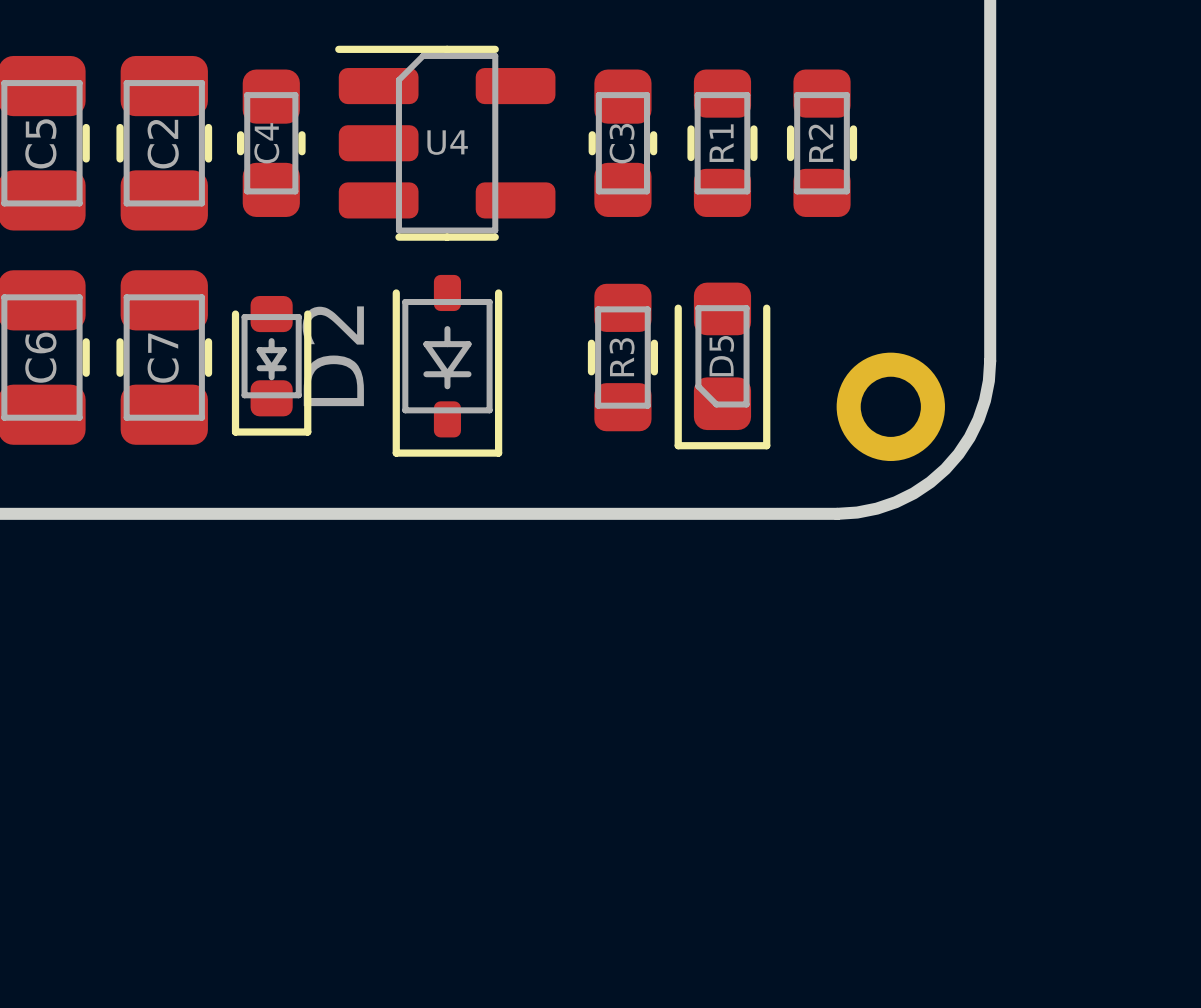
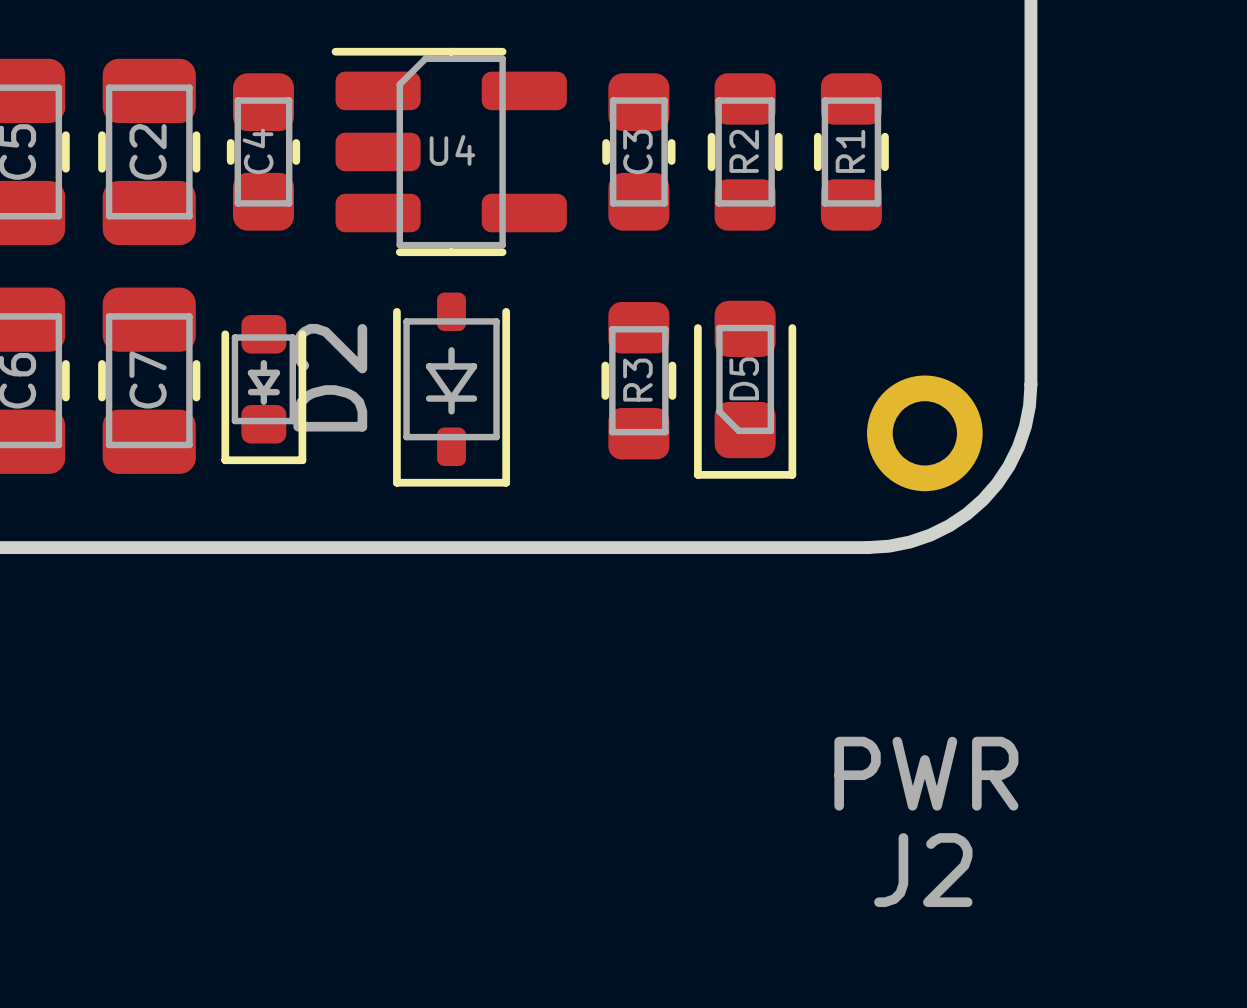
R1 name: R1 (721, 143) -> R2 (744, 151)
R2 name: R2 (820, 143) -> R1 (850, 151)
J2 value: none -> PWR (926, 773)
J2 name: none -> J2 (923, 870)

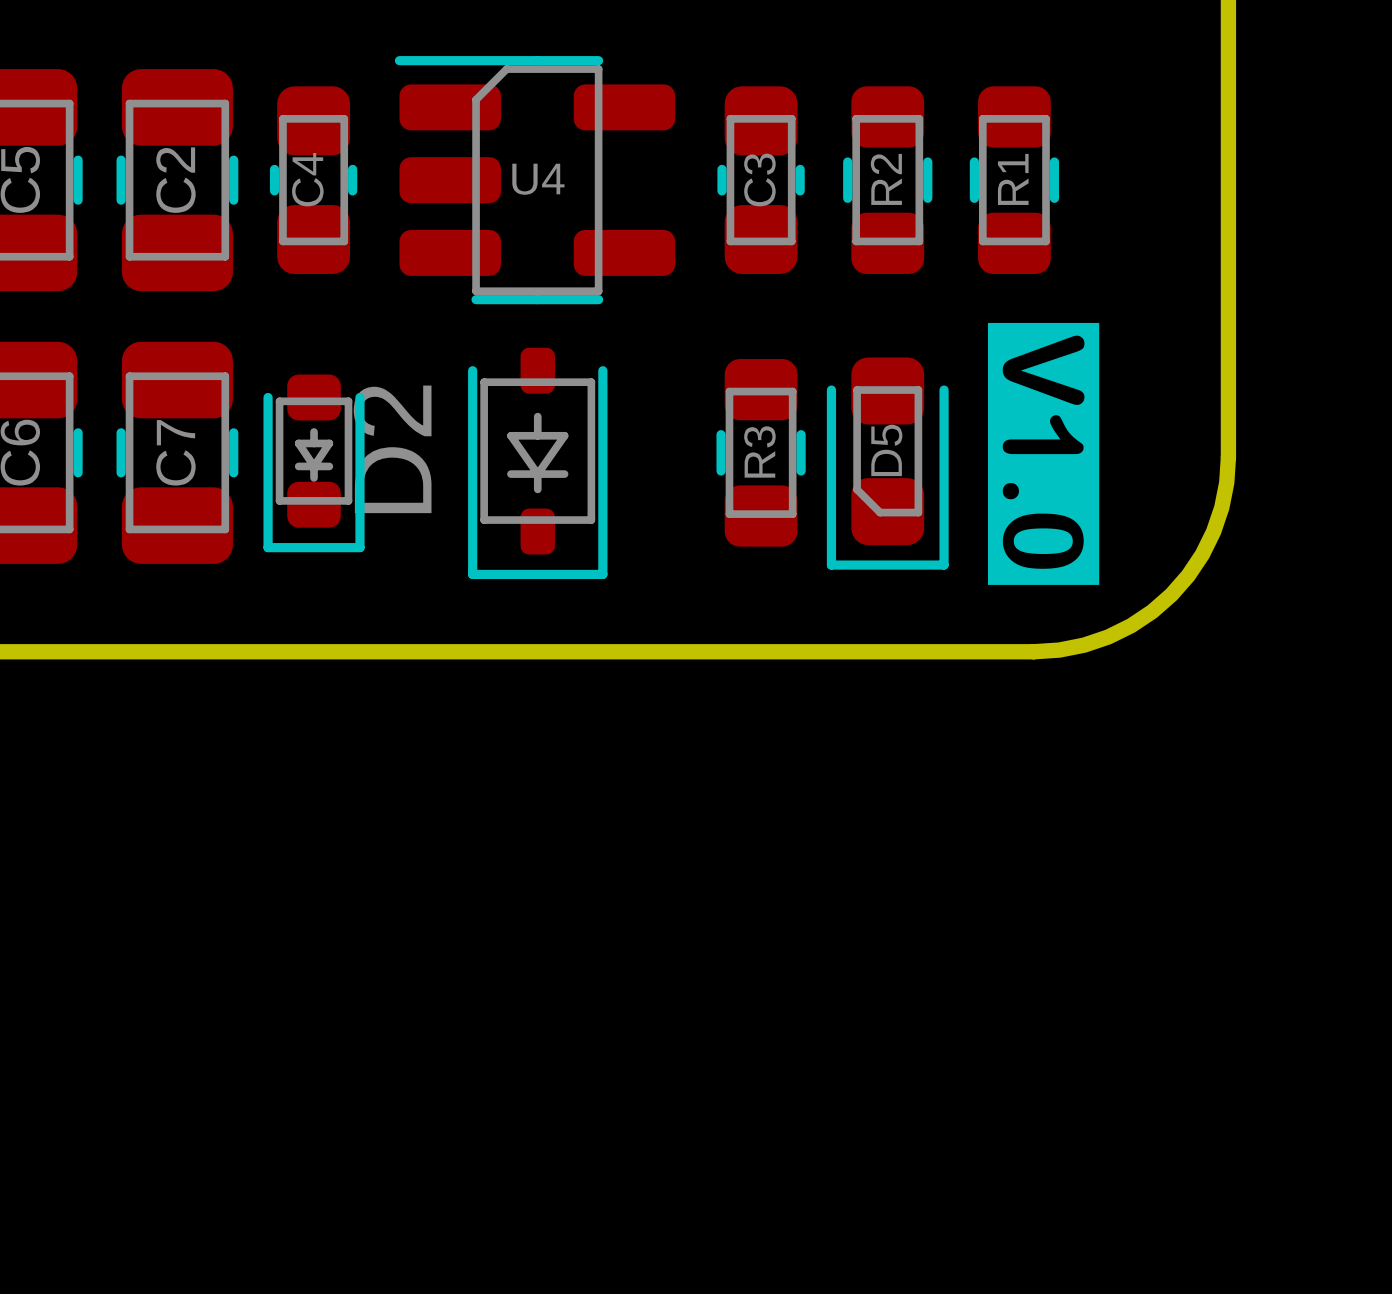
drawing: none -> [987, 322, 1100, 585]
J2: PWR (924, 433) -> none

